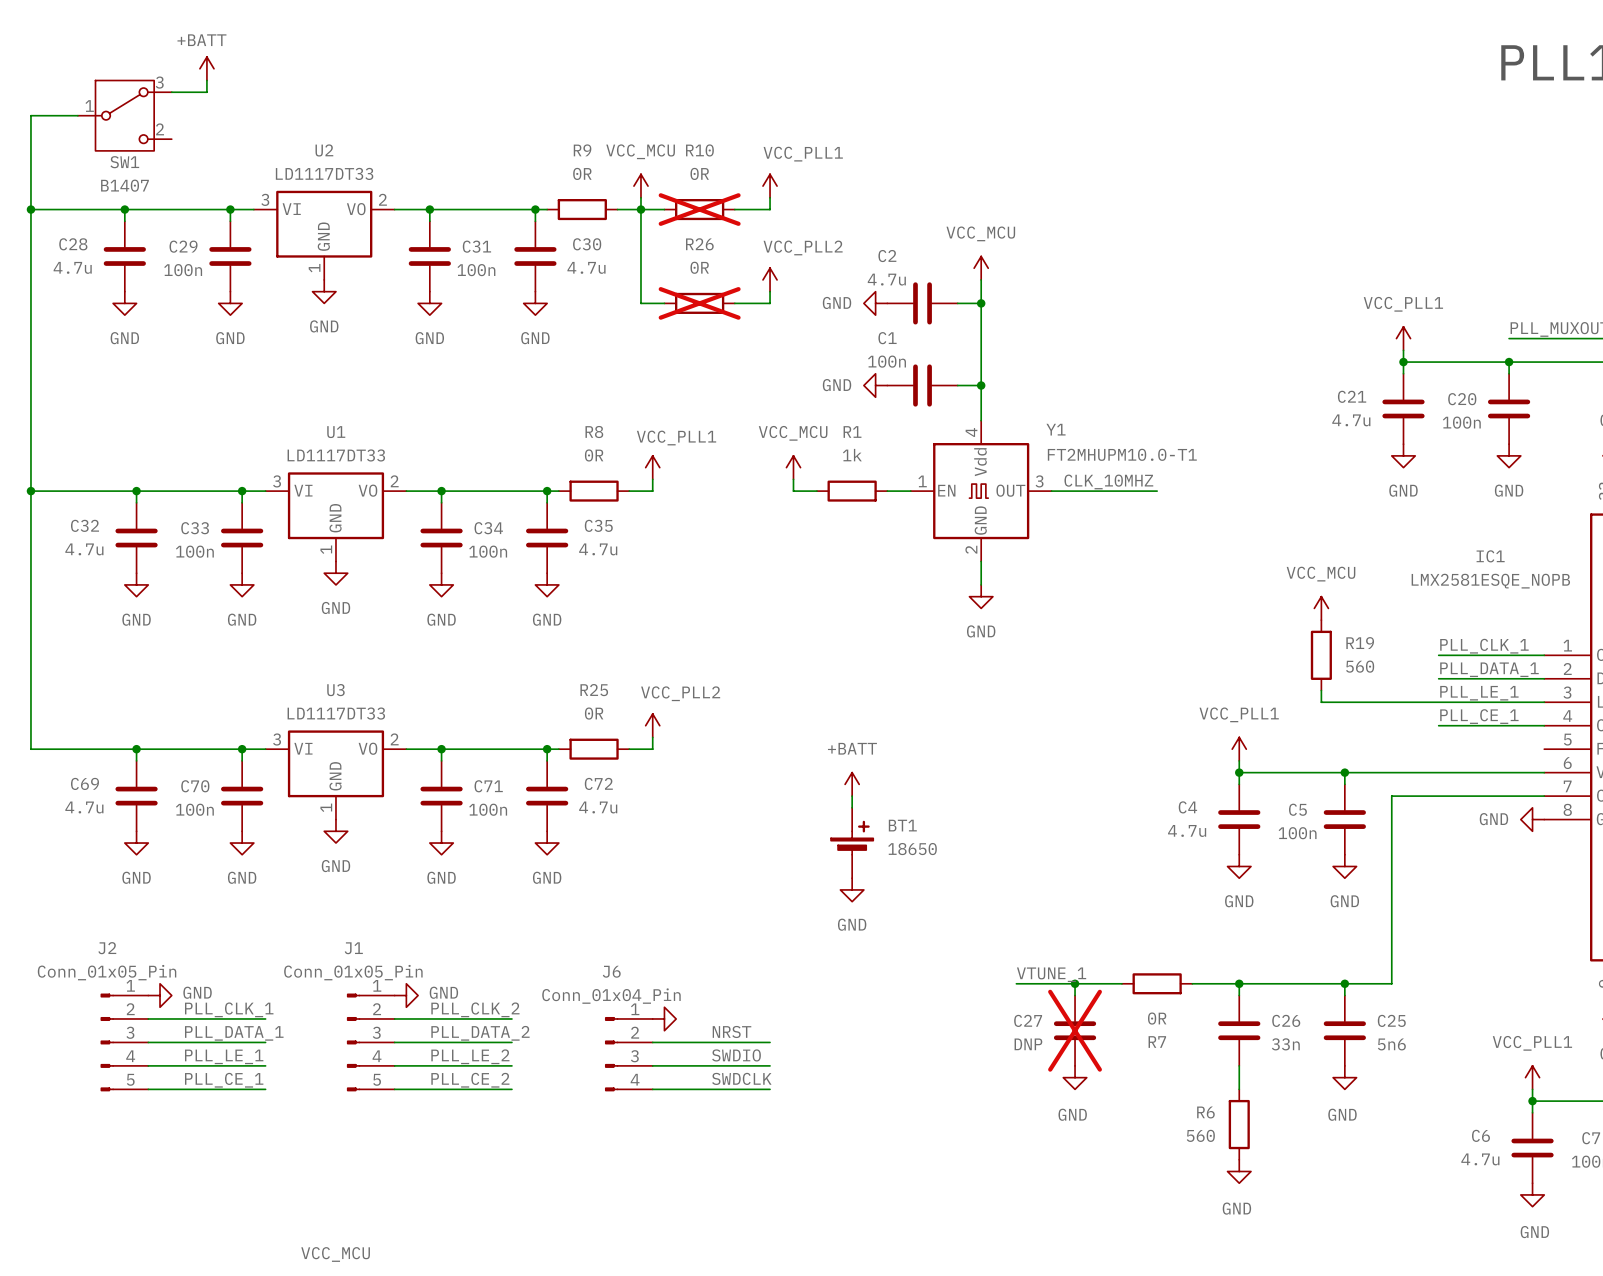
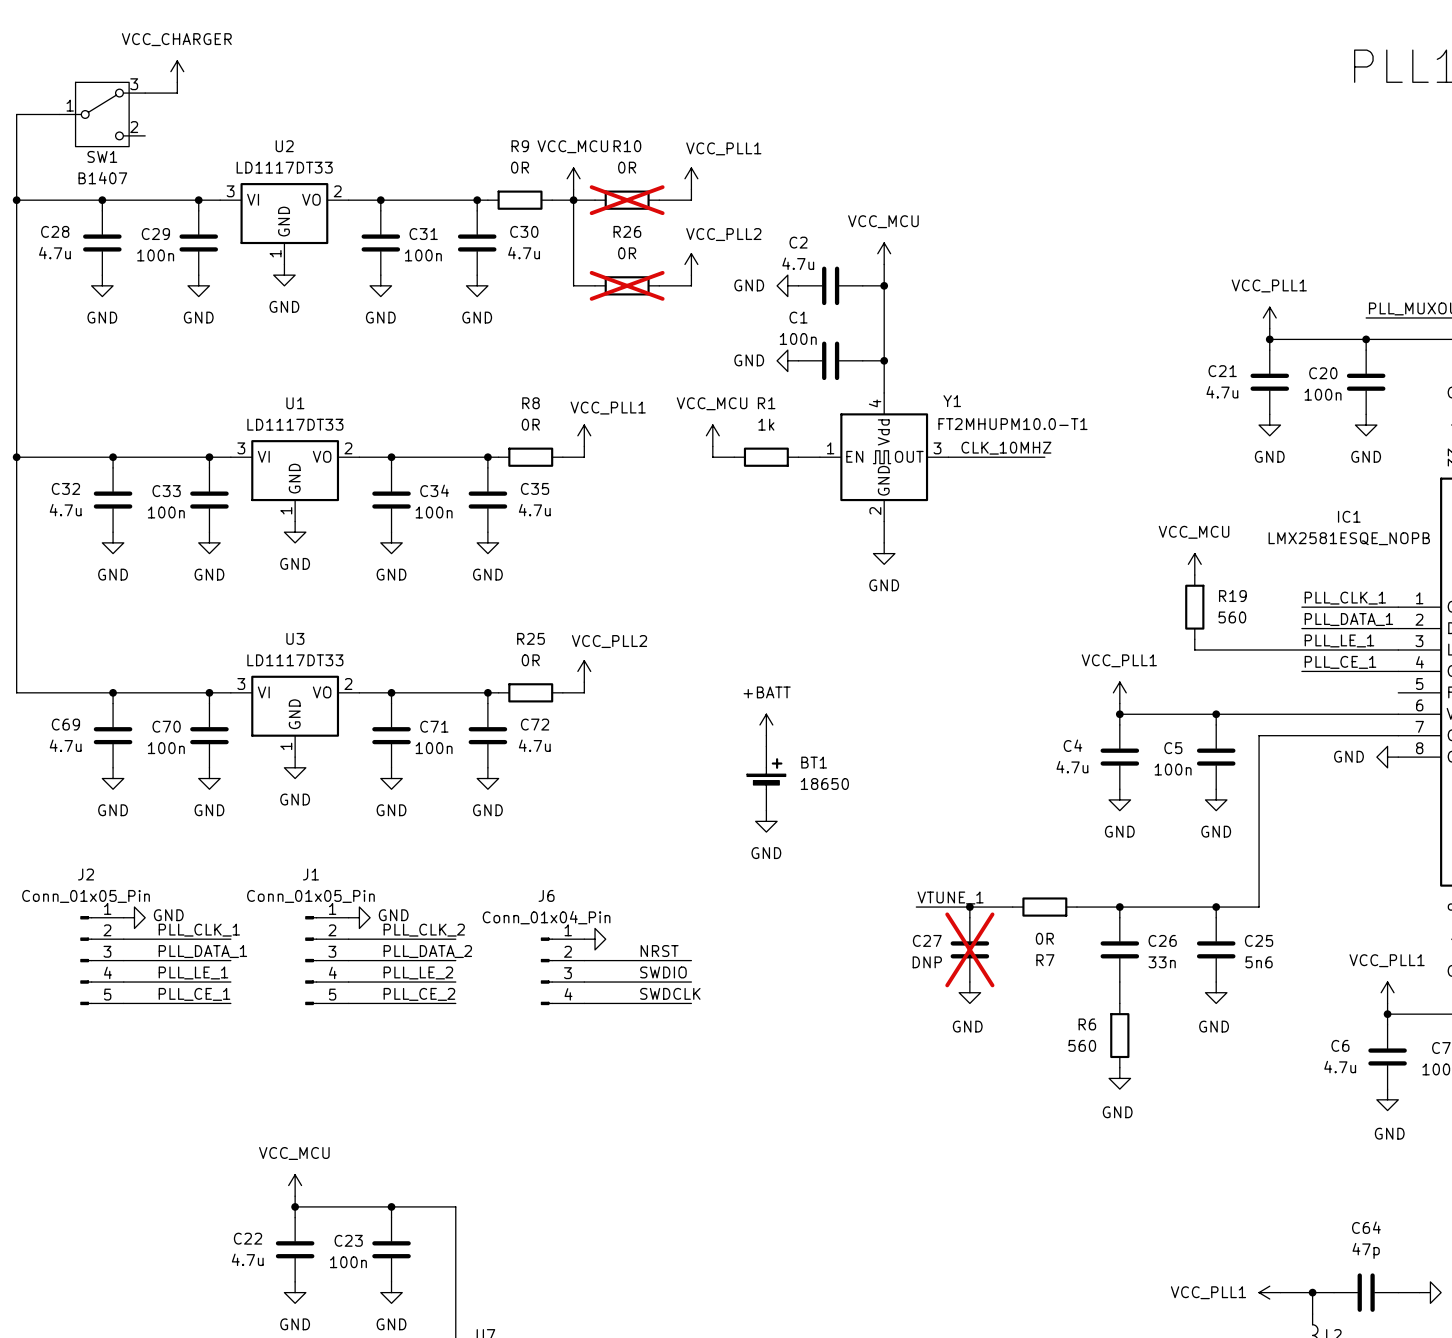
power symbol: +BATT (206, 68) -> VCC_CHARGER (177, 71)

